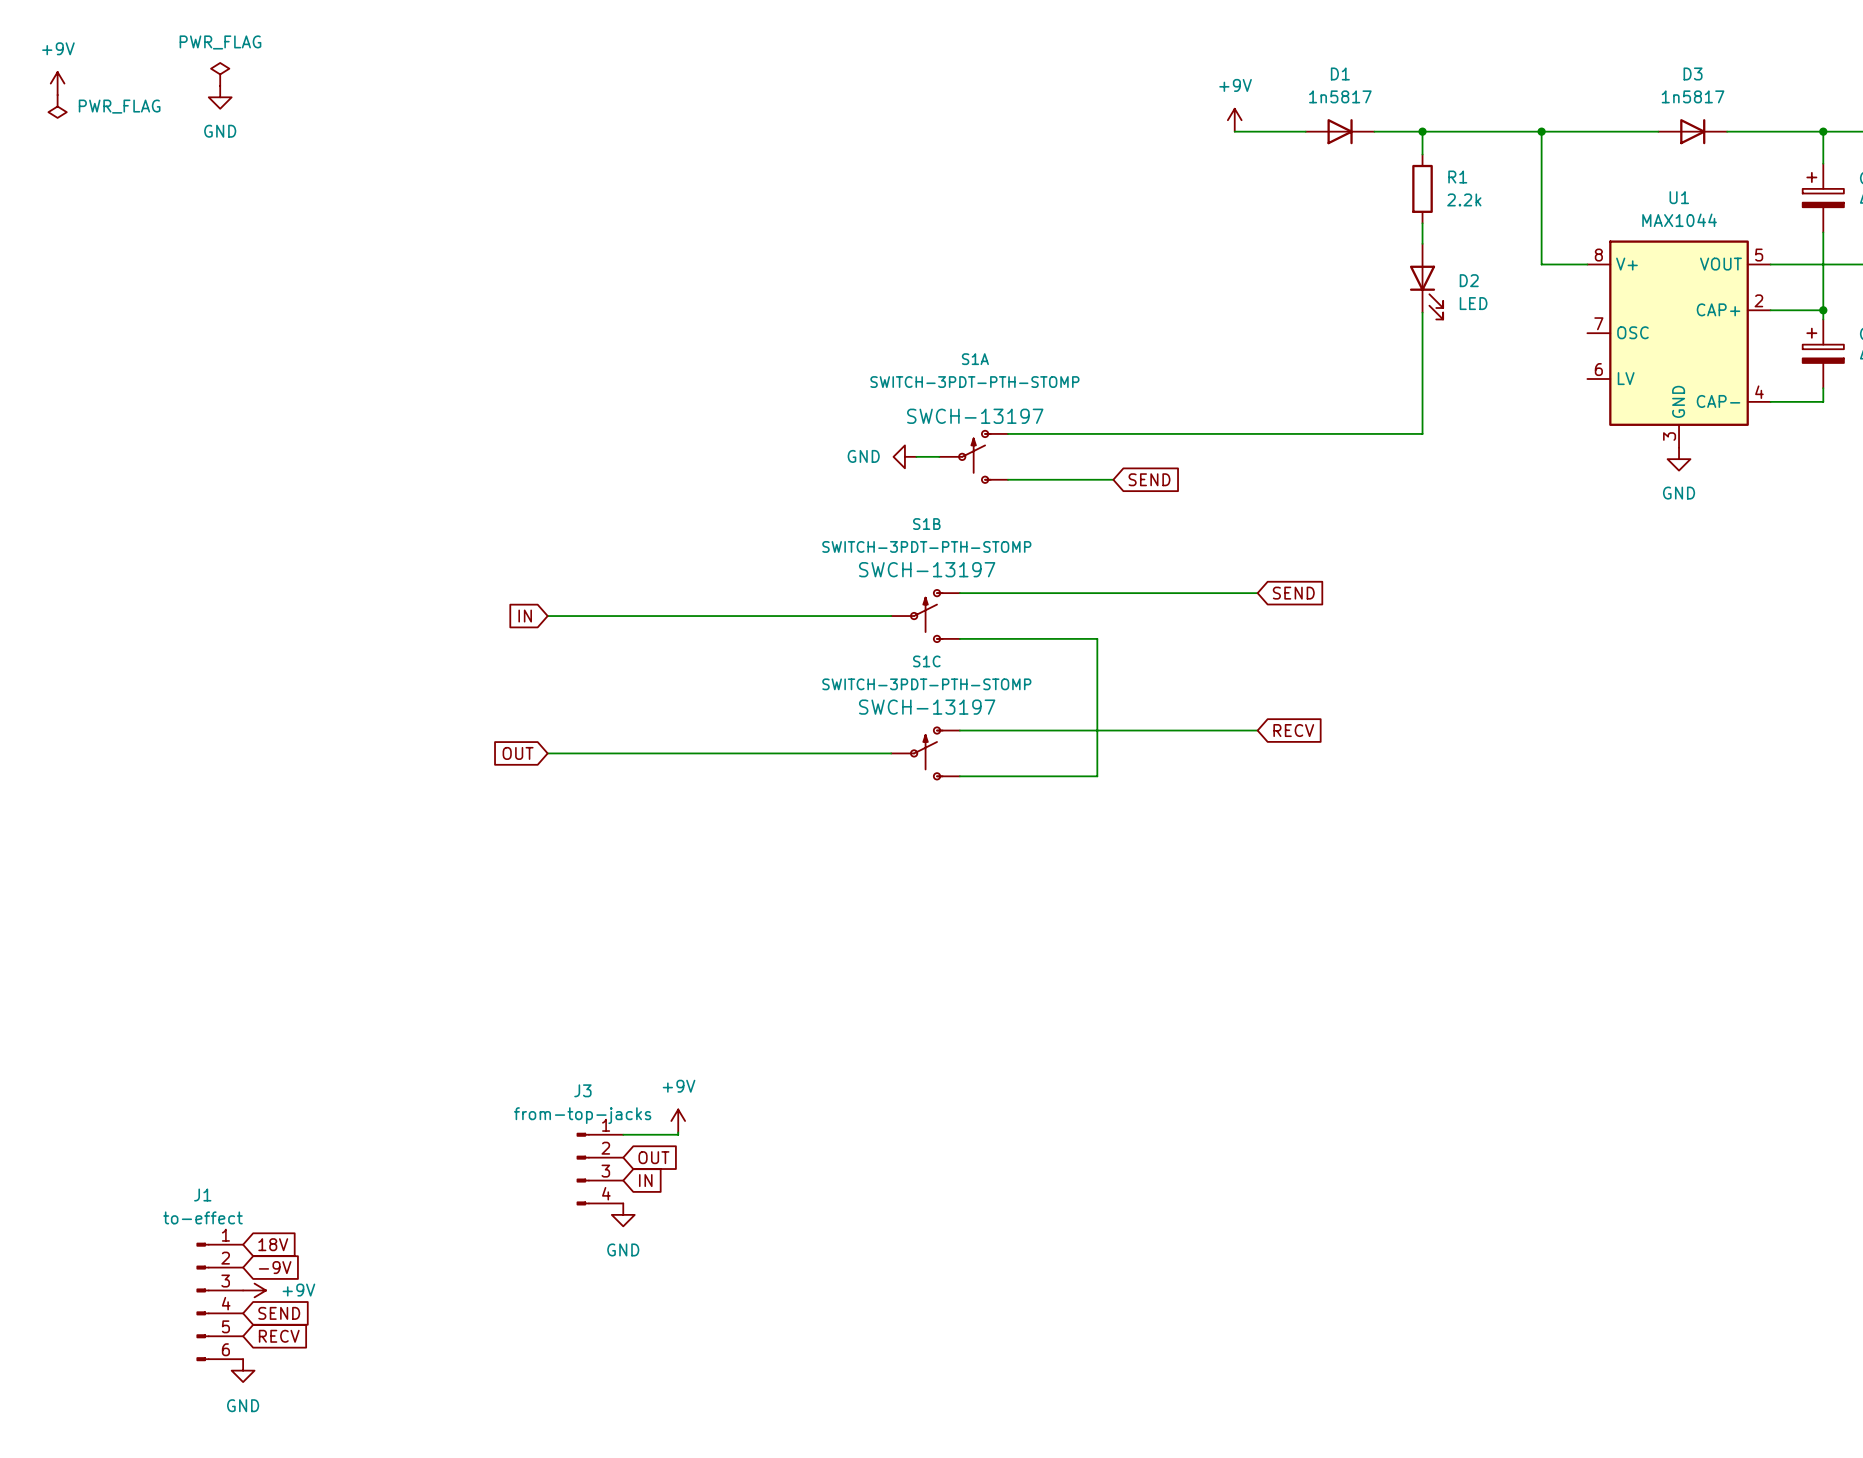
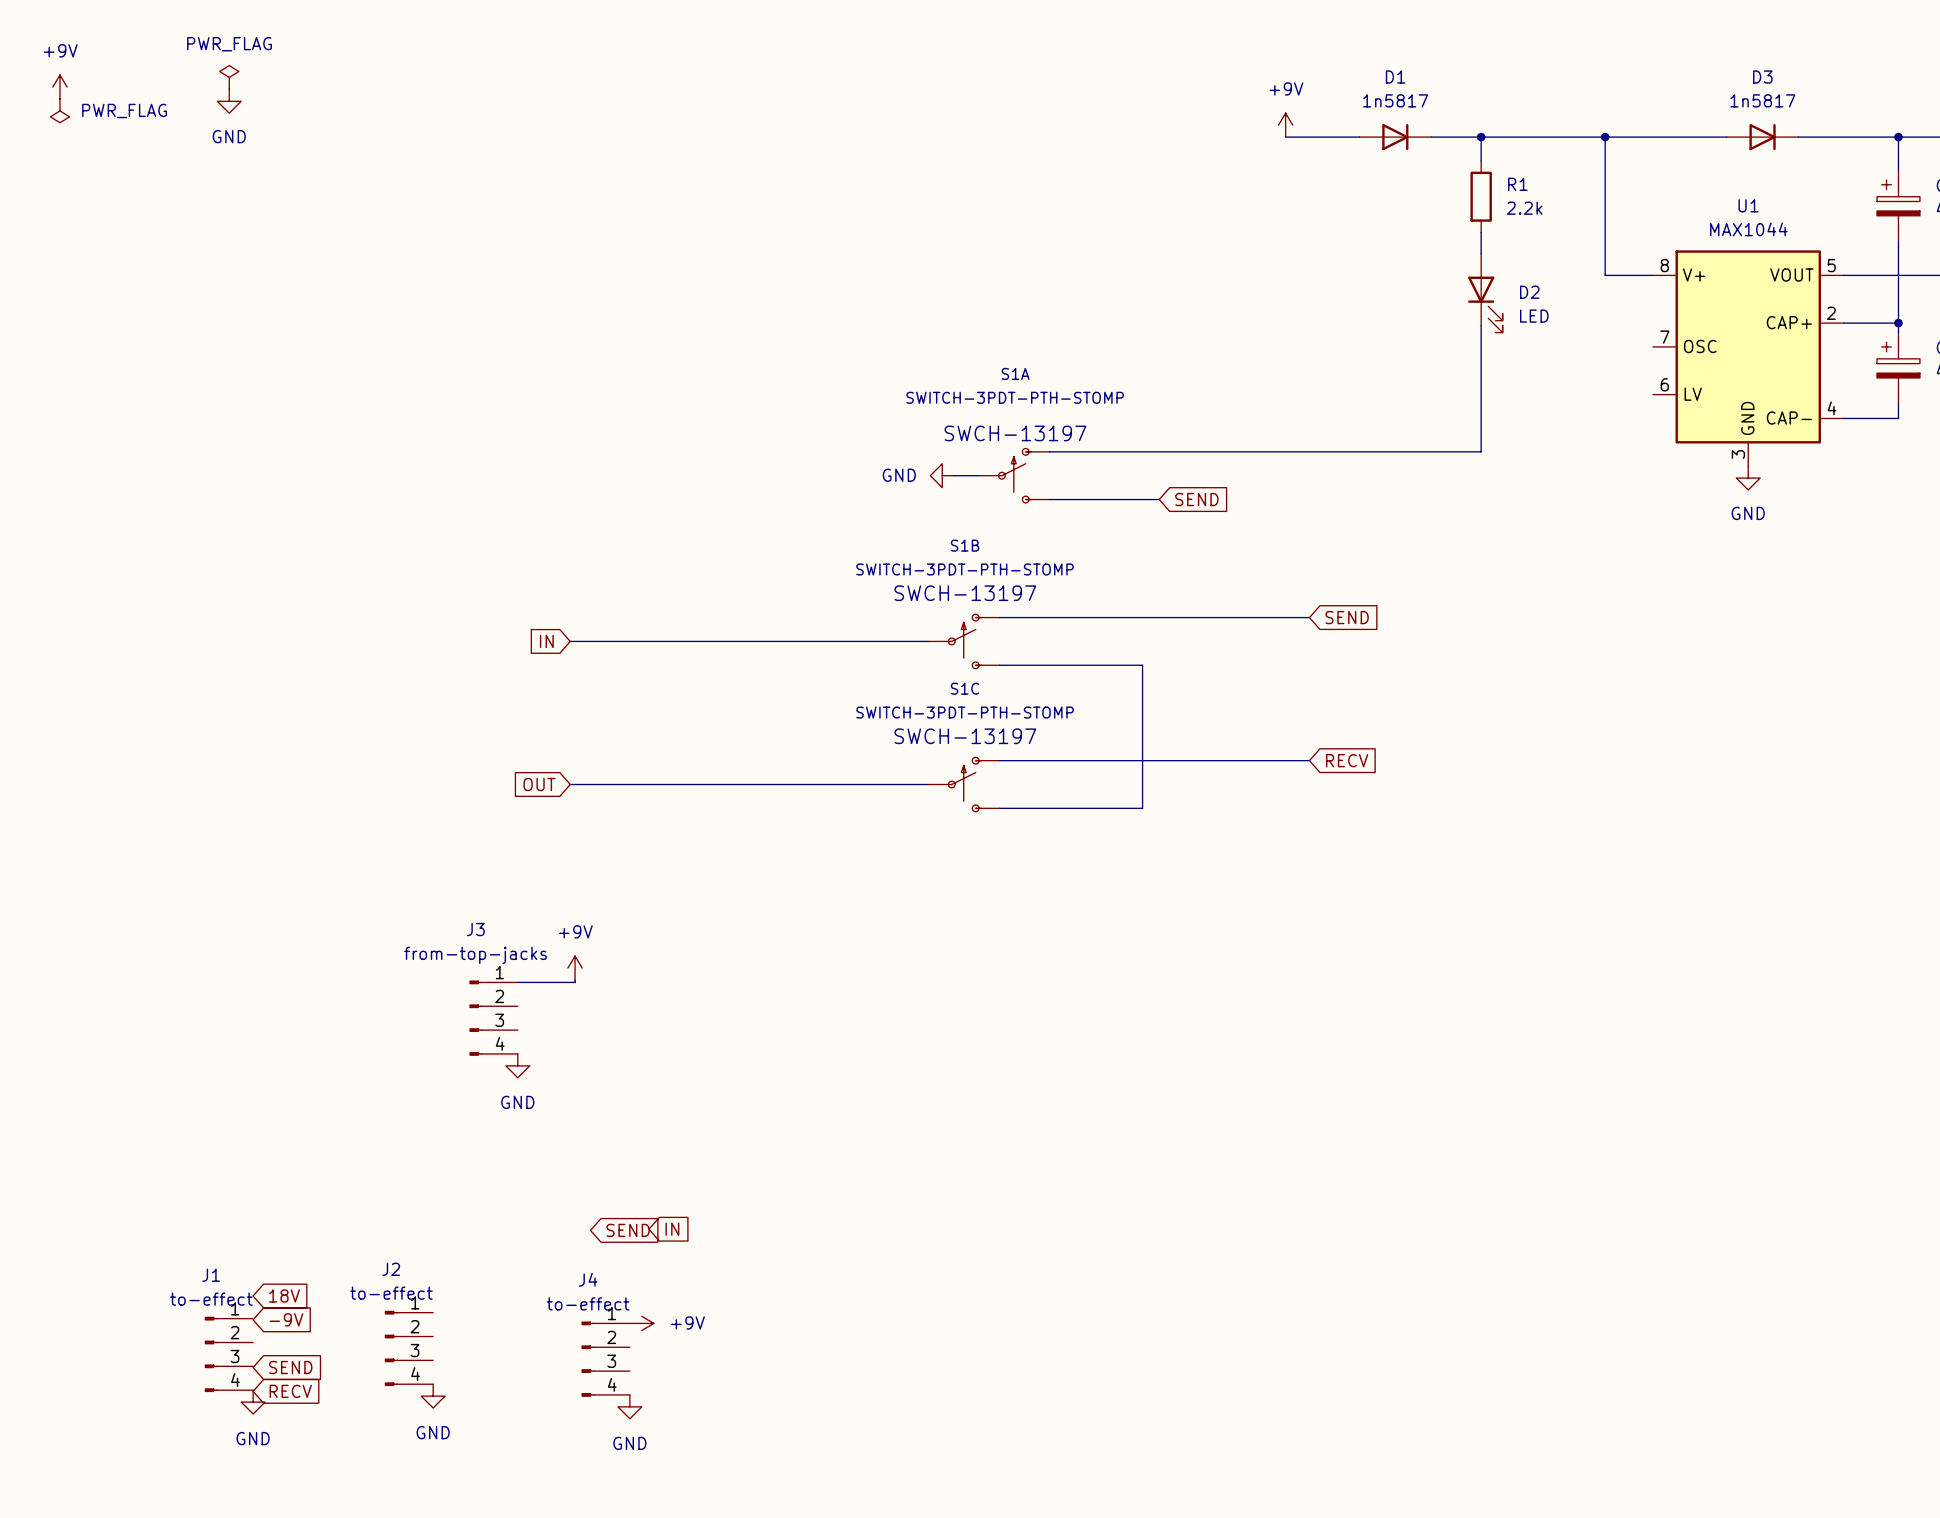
power symbol: none -> +9V (575, 968)
wire: none -> (575, 980) (575, 982) (517, 982)
power symbol: none -> GND (517, 1065)
J3 name position: J3 (582, 1090) -> J3 (475, 929)
J3 value position: from-top-jacks (582, 1115) -> from-top-jacks (475, 955)
power symbol: +9V (678, 1121) -> none
wire: (678, 1132) (678, 1134) (623, 1134) -> none
global label: OUT (653, 1157) -> none
J3 position: (600, 1169) -> (493, 1018)
global label: none -> SEND (628, 1230)
J1 name position: J1 (202, 1195) -> J1 (211, 1275)
power symbol: GND (623, 1214) -> none
J1 value position: to-effect (203, 1217) -> to-effect (211, 1299)
J1 symbol: [196, 1242, 244, 1362] -> [204, 1316, 254, 1393]
power symbol: none -> +9V (641, 1323)
power symbol: +9V (254, 1290) -> none
J2: none -> to-effect (408, 1348)
J4: none -> to-effect (605, 1359)
power symbol: none -> GND (433, 1396)
power symbol: none -> GND (629, 1406)
power symbol position: GND (243, 1370) -> GND (253, 1402)

